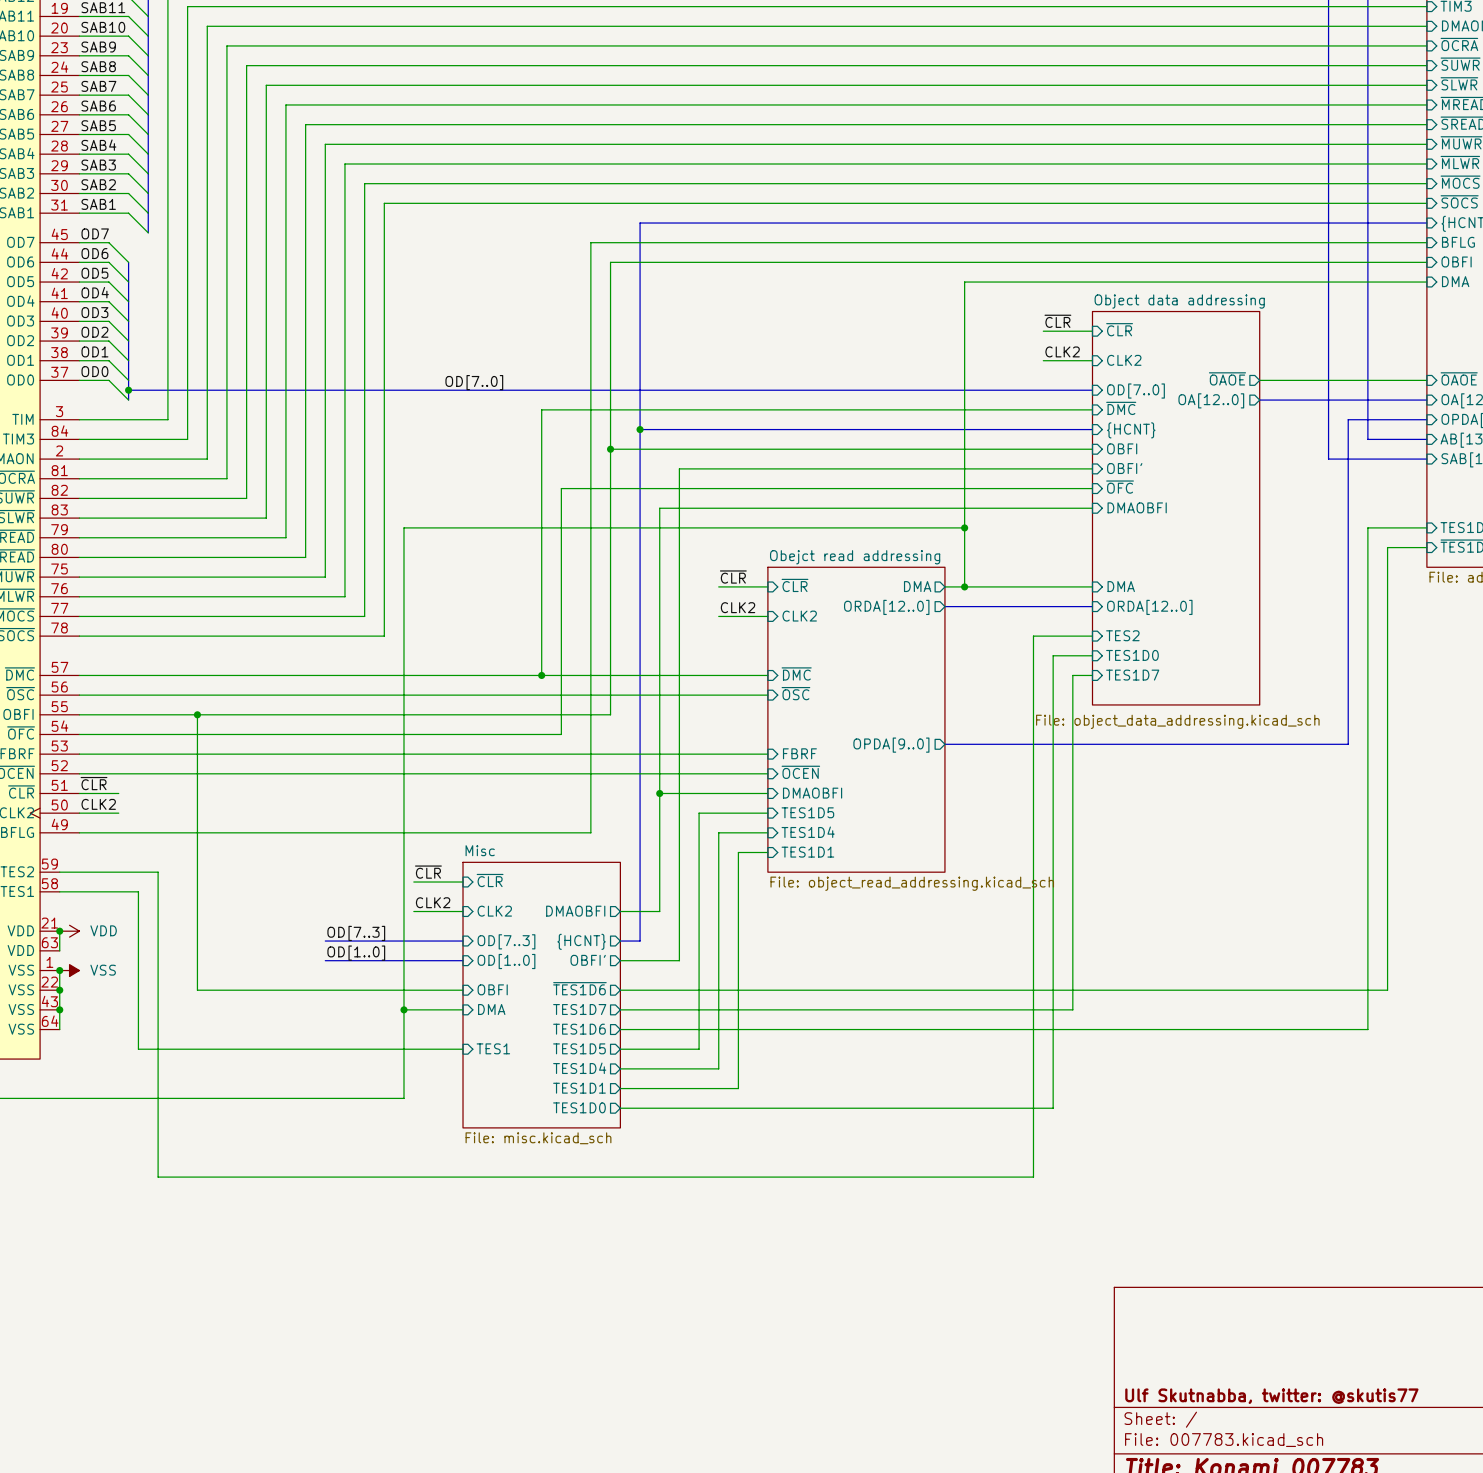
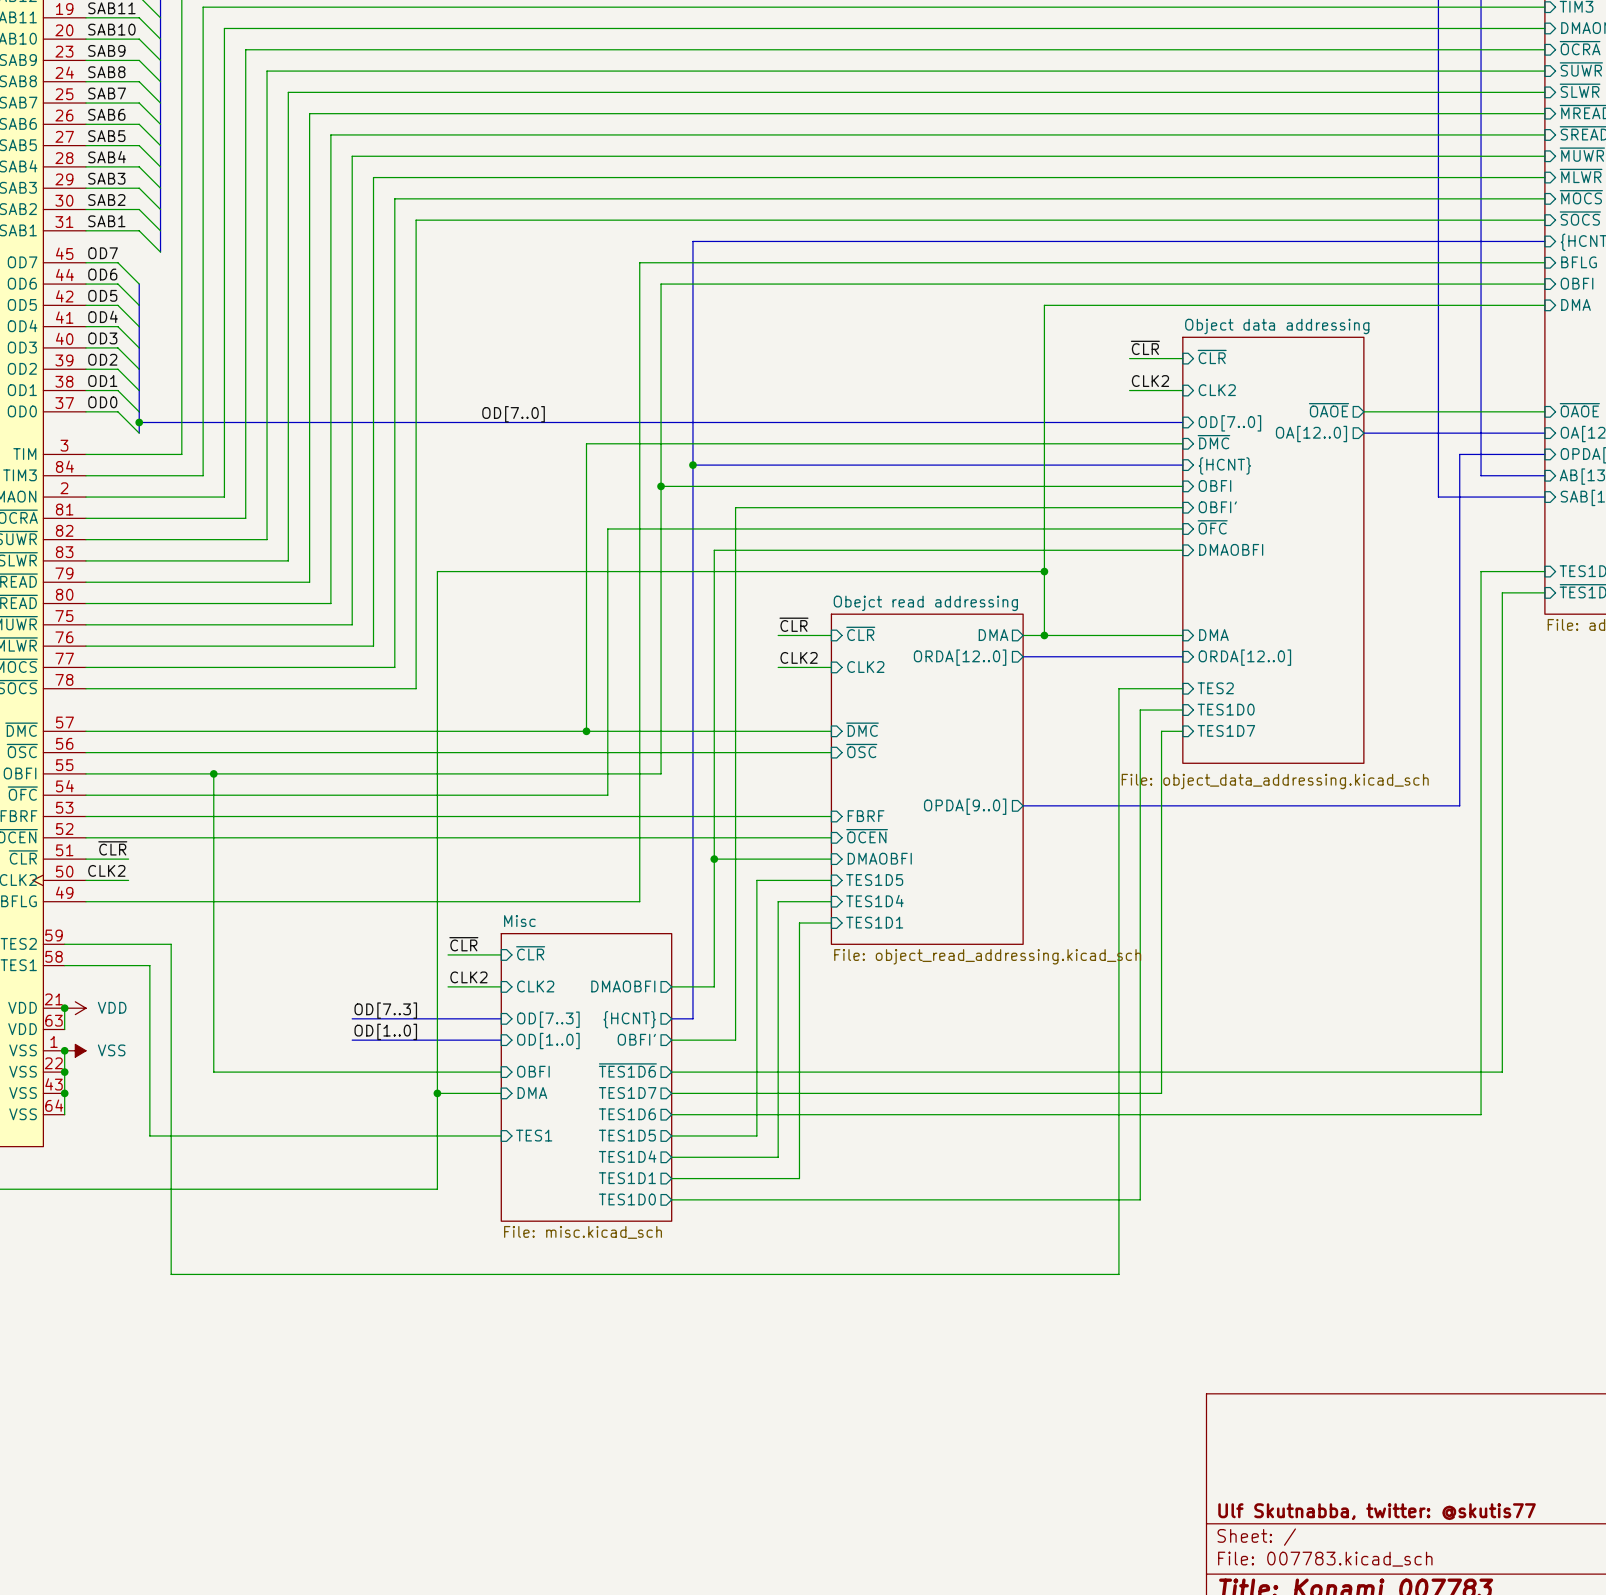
label position: ~{CLR} (94, 783) -> ~{CLR} (112, 848)

